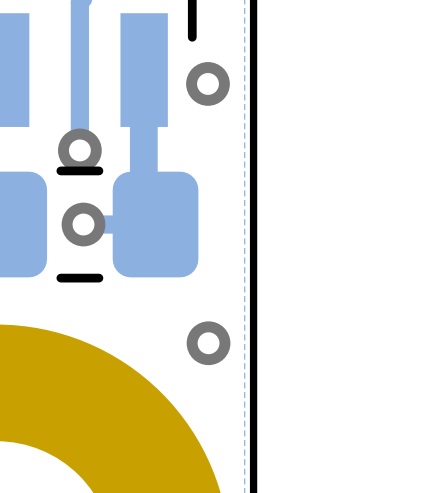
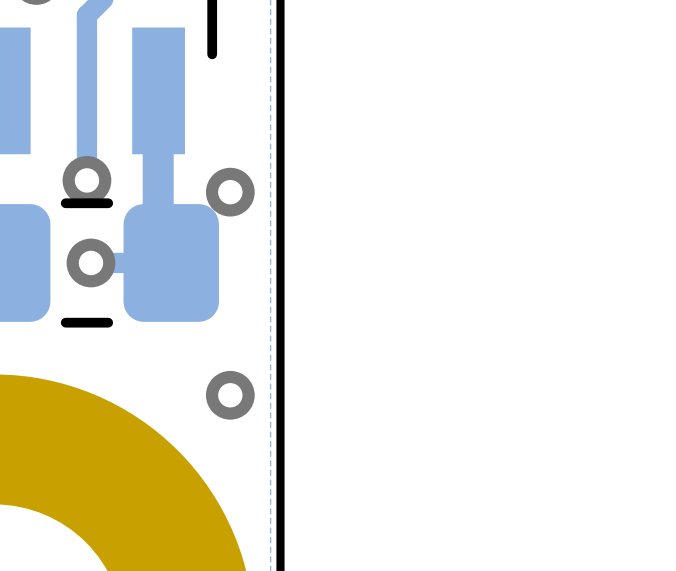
via position: (207, 83) -> (230, 192)

